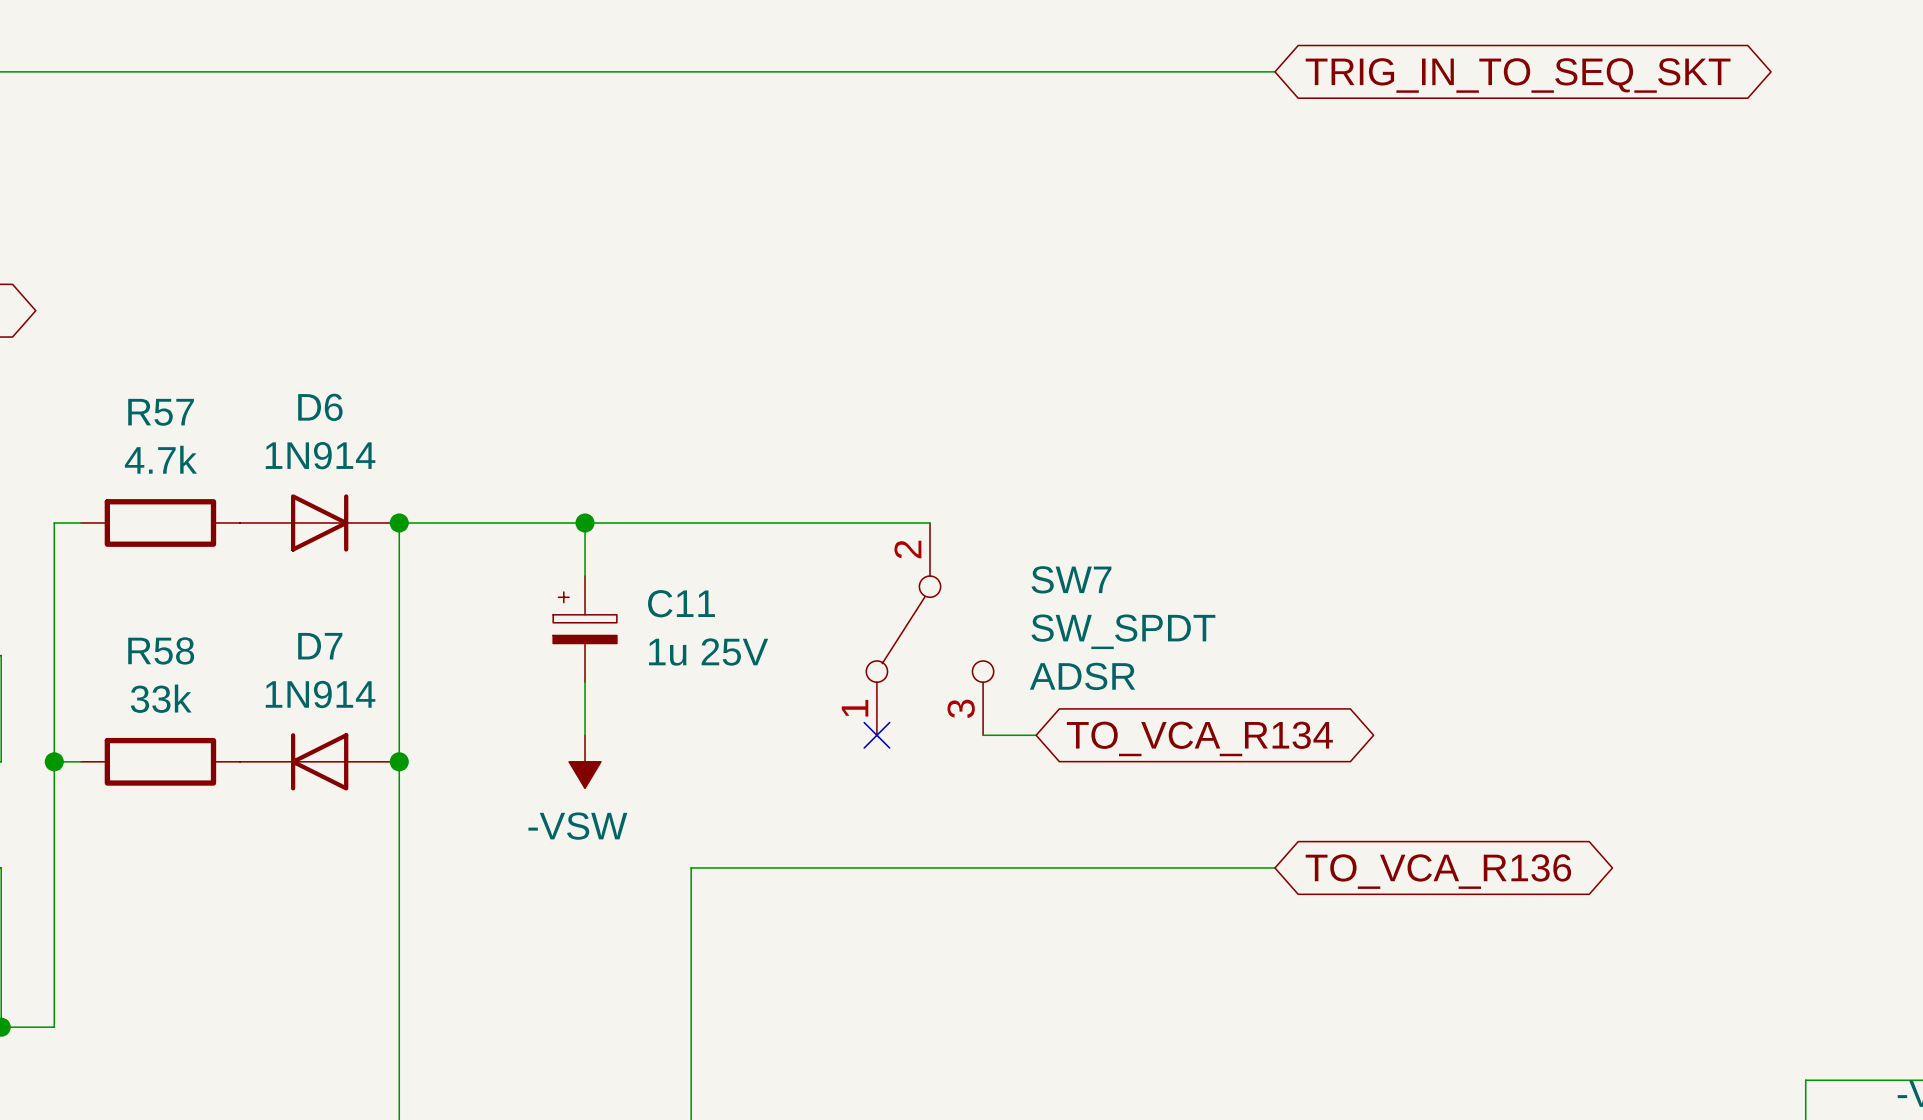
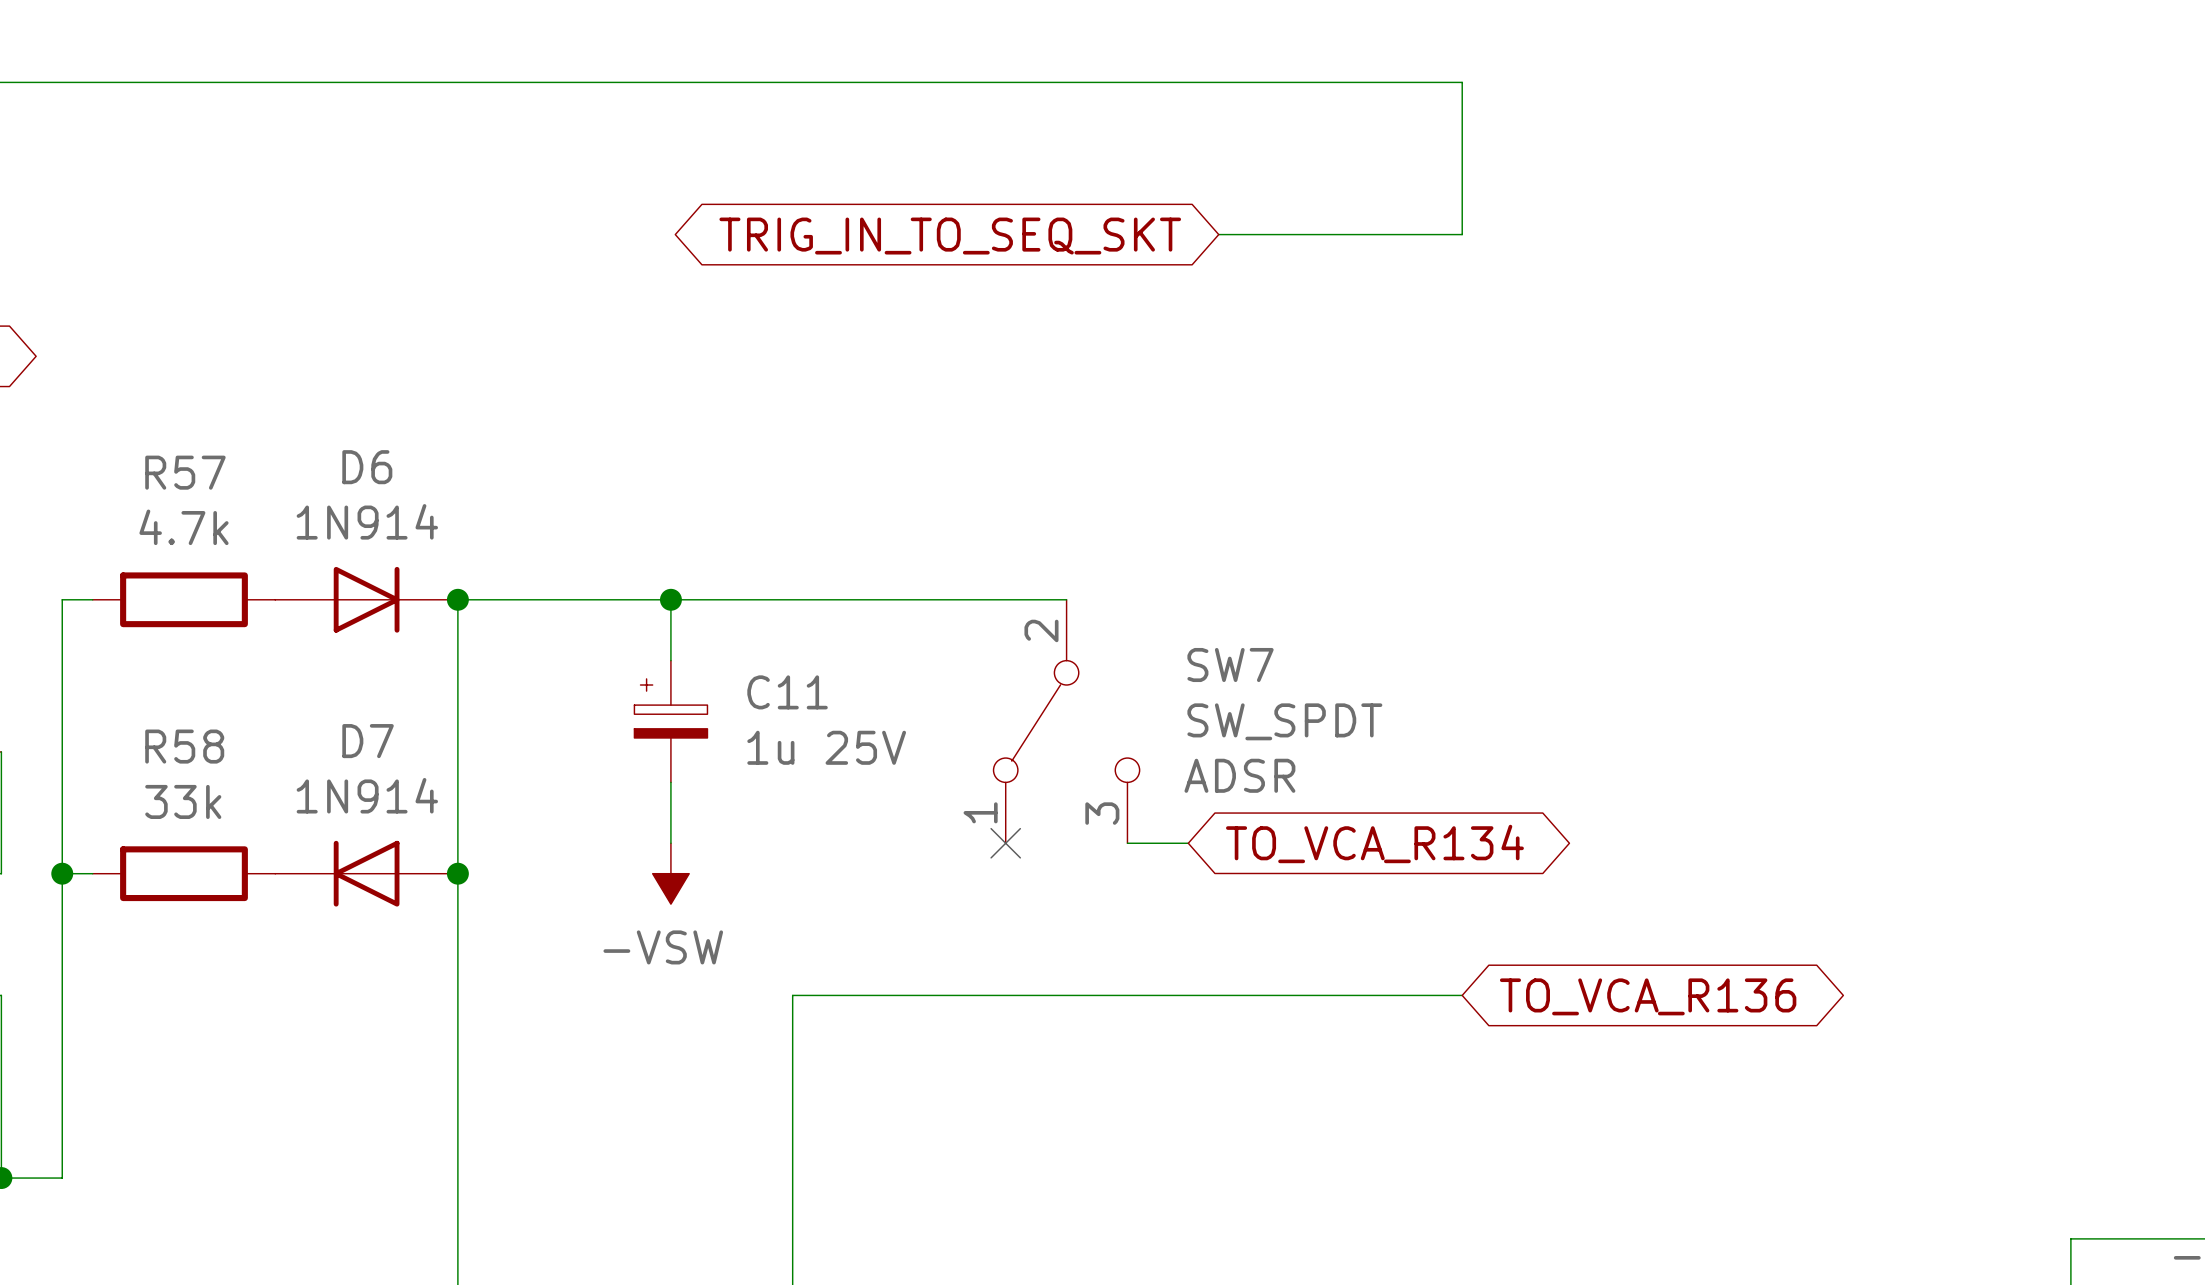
wire: none -> (1462, 82) (1462, 234) (1218, 234)
global label rotation: 0° (1518, 75) -> 180° (950, 236)
global label position: TRIG_IN_TO_SEQ_SKT (1518, 75) -> TRIG_IN_TO_SEQ_SKT (950, 236)

